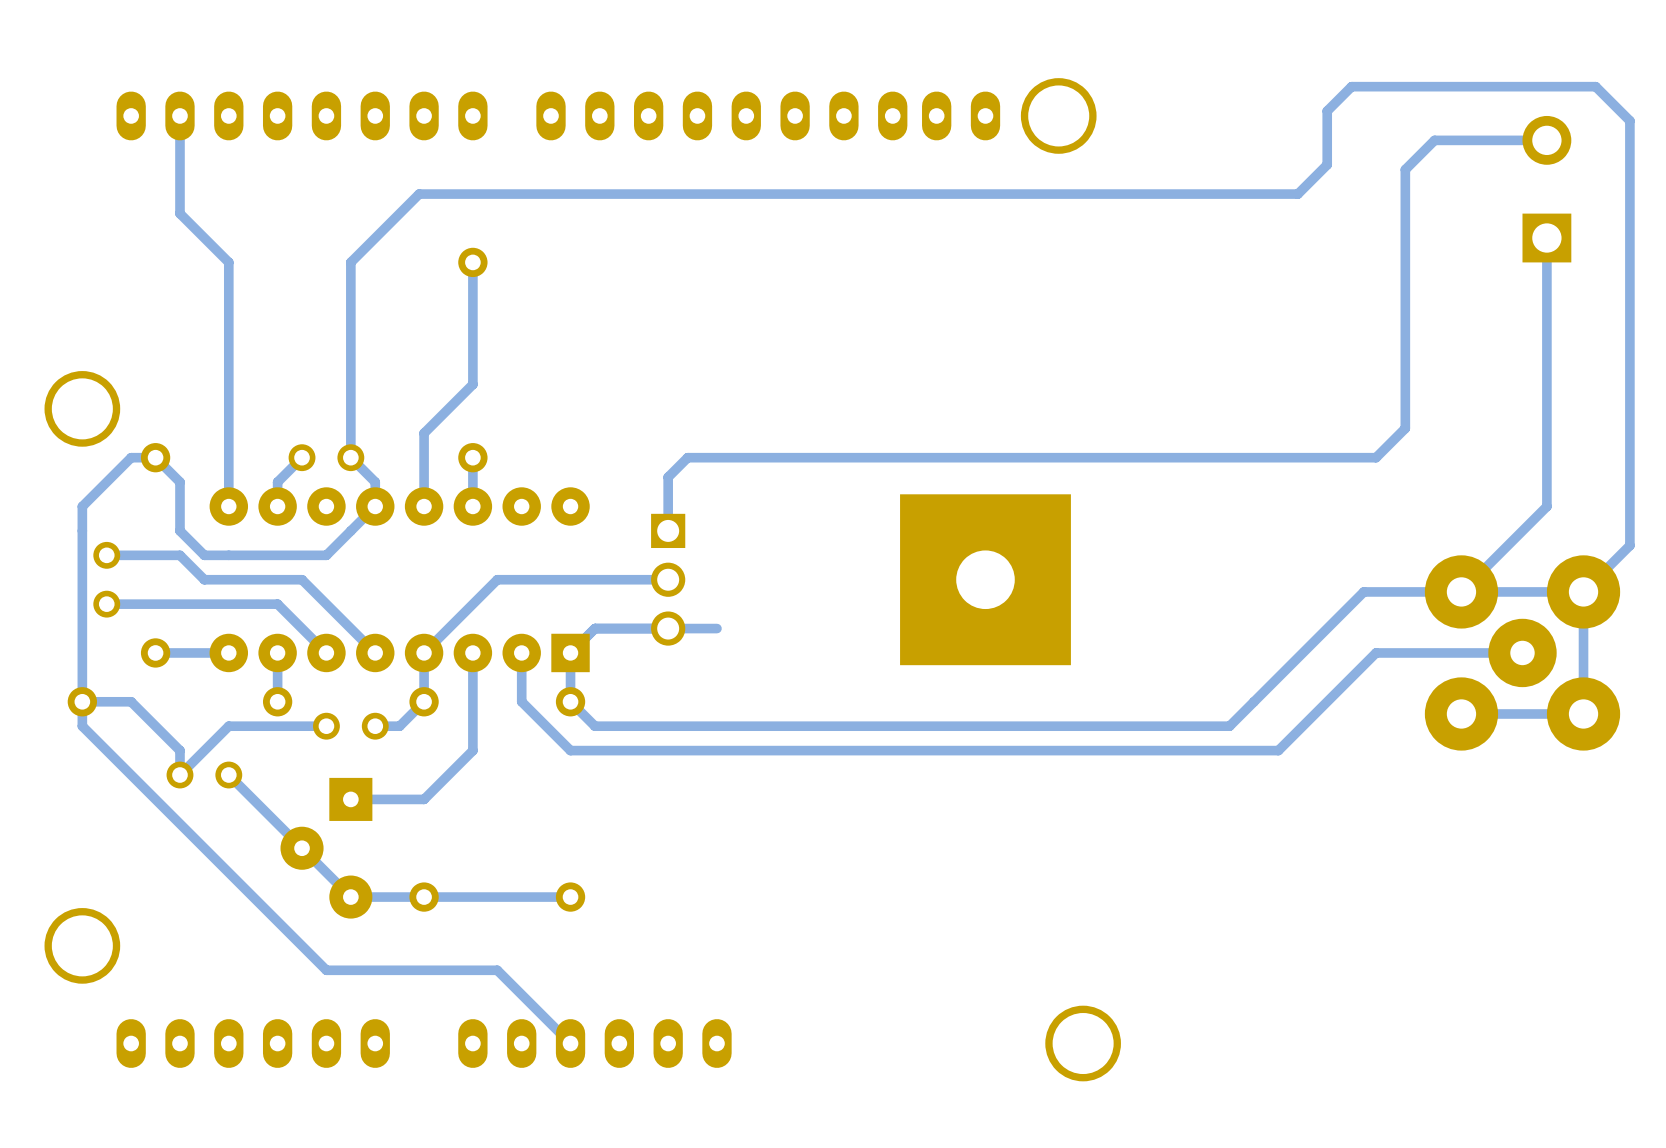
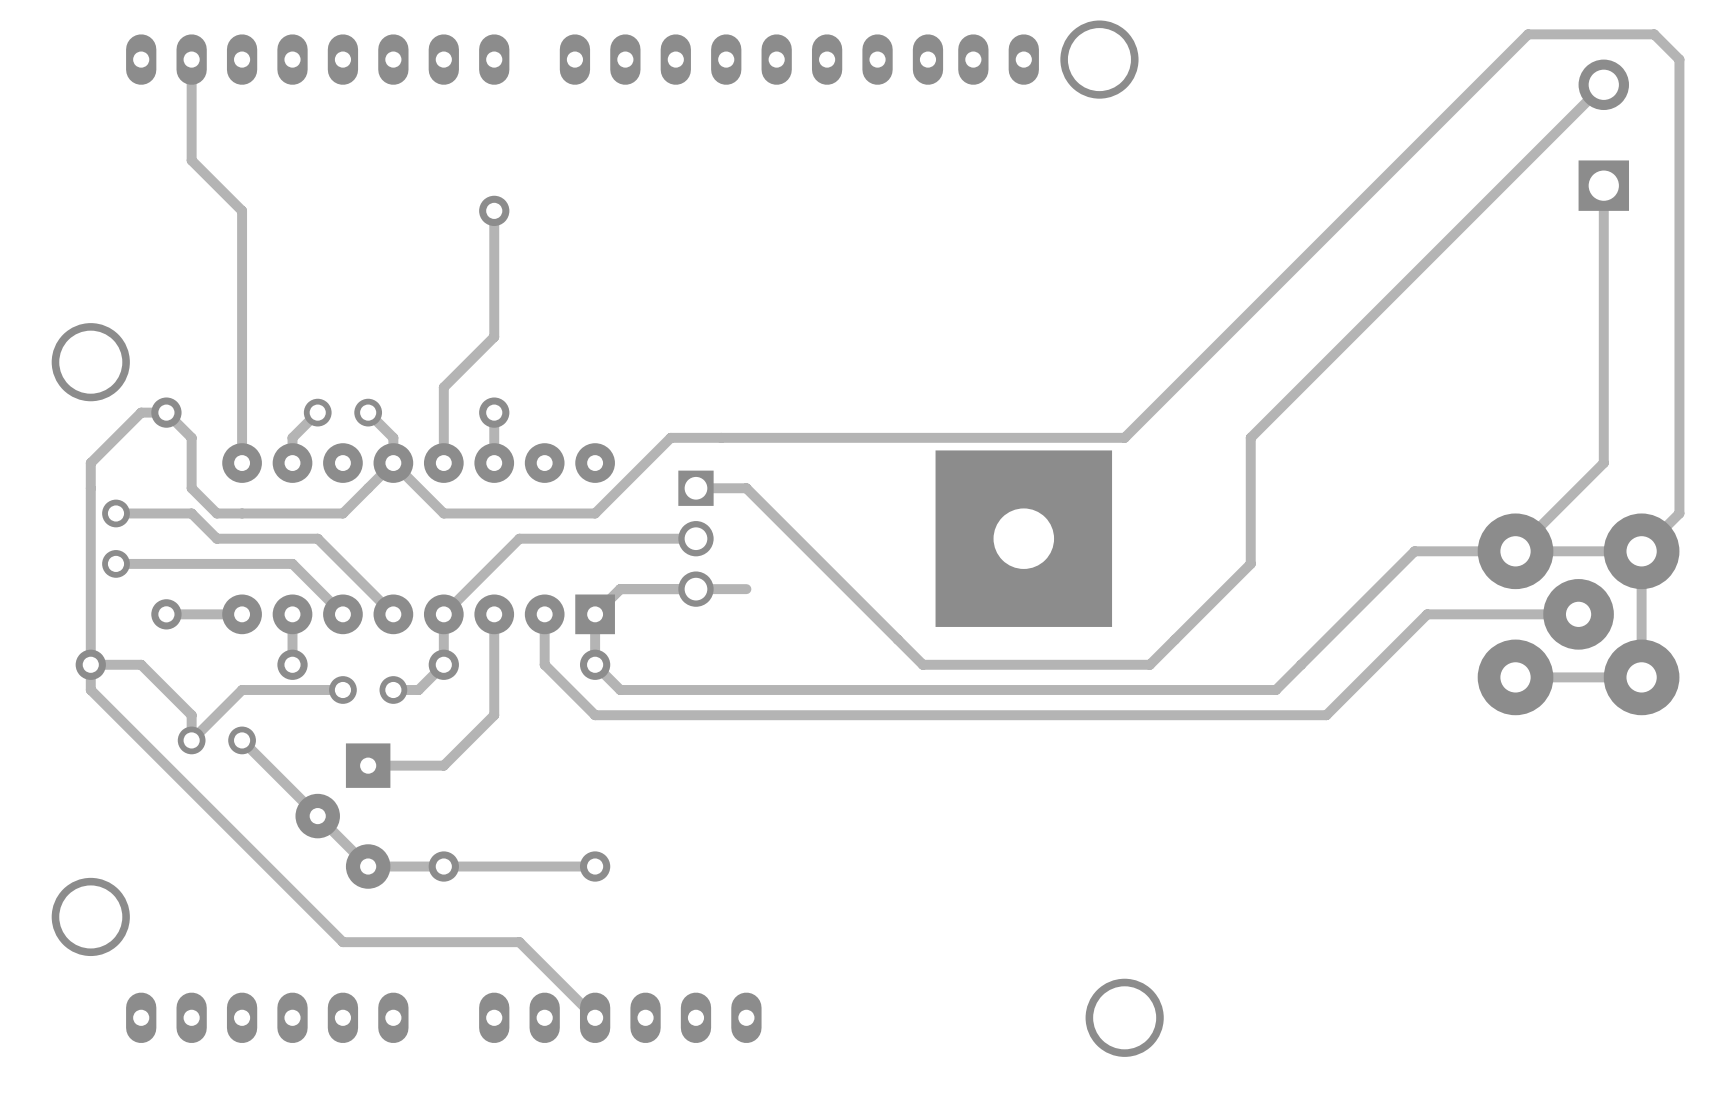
track: (1546, 140) (1434, 140) (1405, 169) (1405, 428) (1376, 457) (687, 457) (668, 477) (668, 530) -> (1603, 84) (1250, 437) (1250, 563) (1149, 664) (922, 664) (746, 488) (695, 488)
track: (350, 457) (350, 262) (419, 194) (1297, 194) (1327, 164) (1327, 111) (1351, 86) (1595, 86) (1629, 120) (1629, 545) (1620, 555) -> (393, 463) (443, 513) (595, 513) (670, 437) (1124, 437) (1528, 34) (1654, 34) (1679, 59) (1679, 513)

